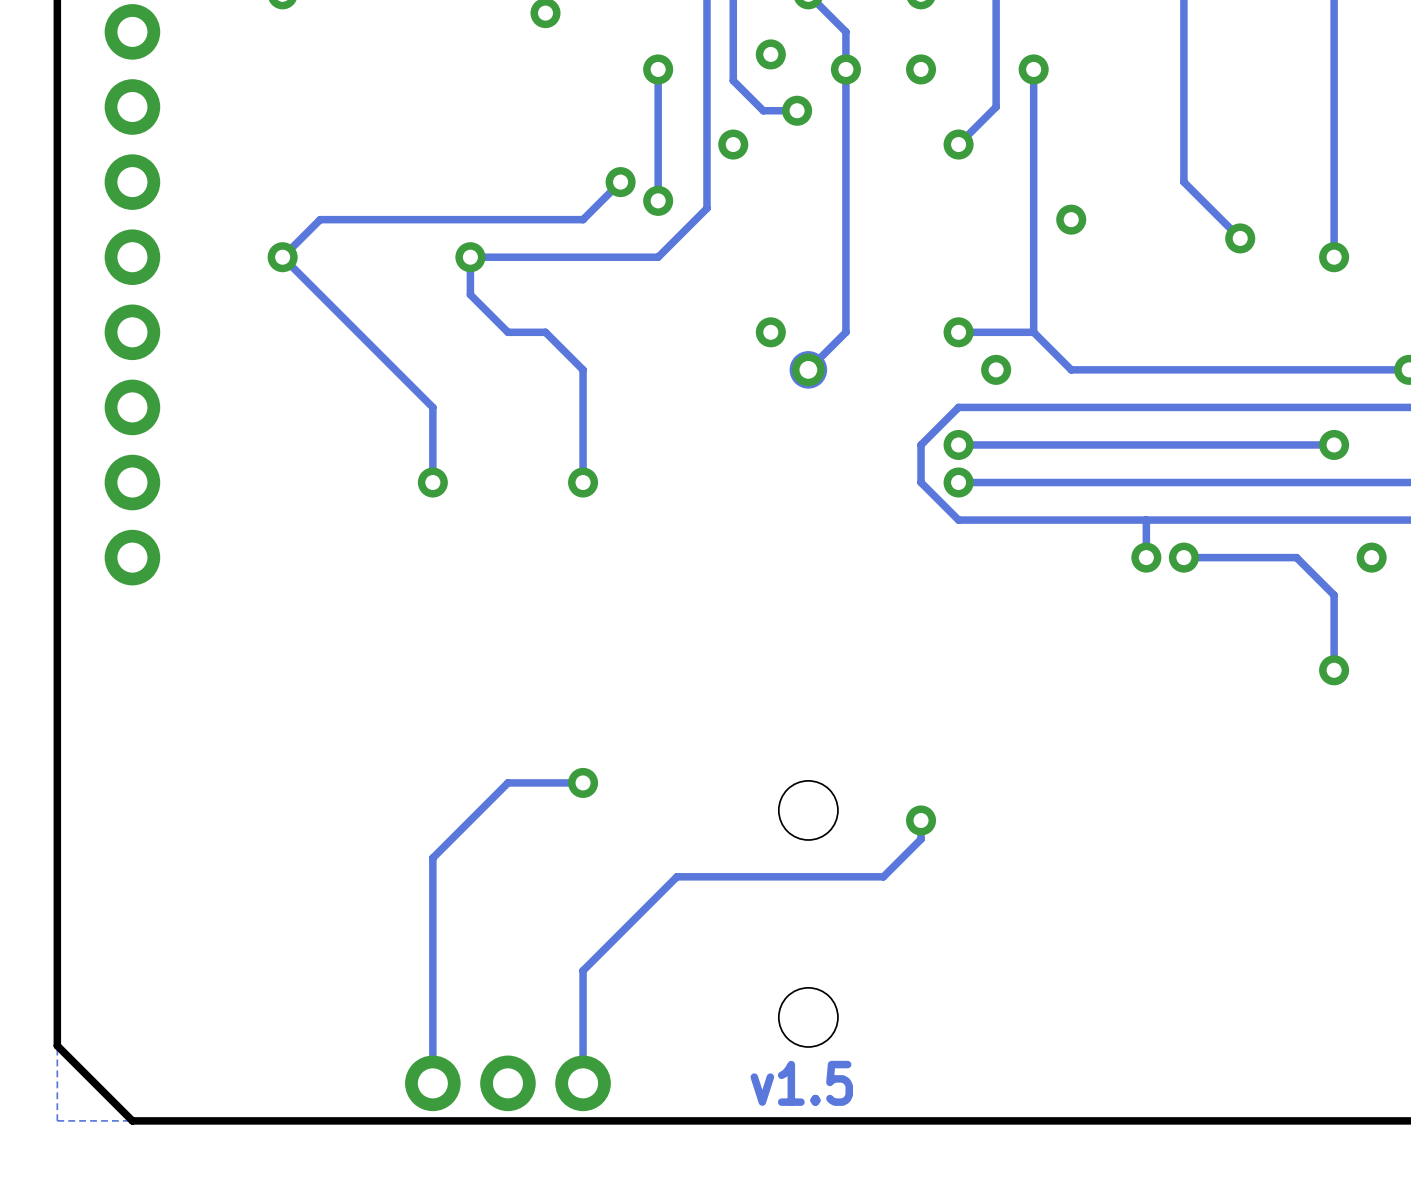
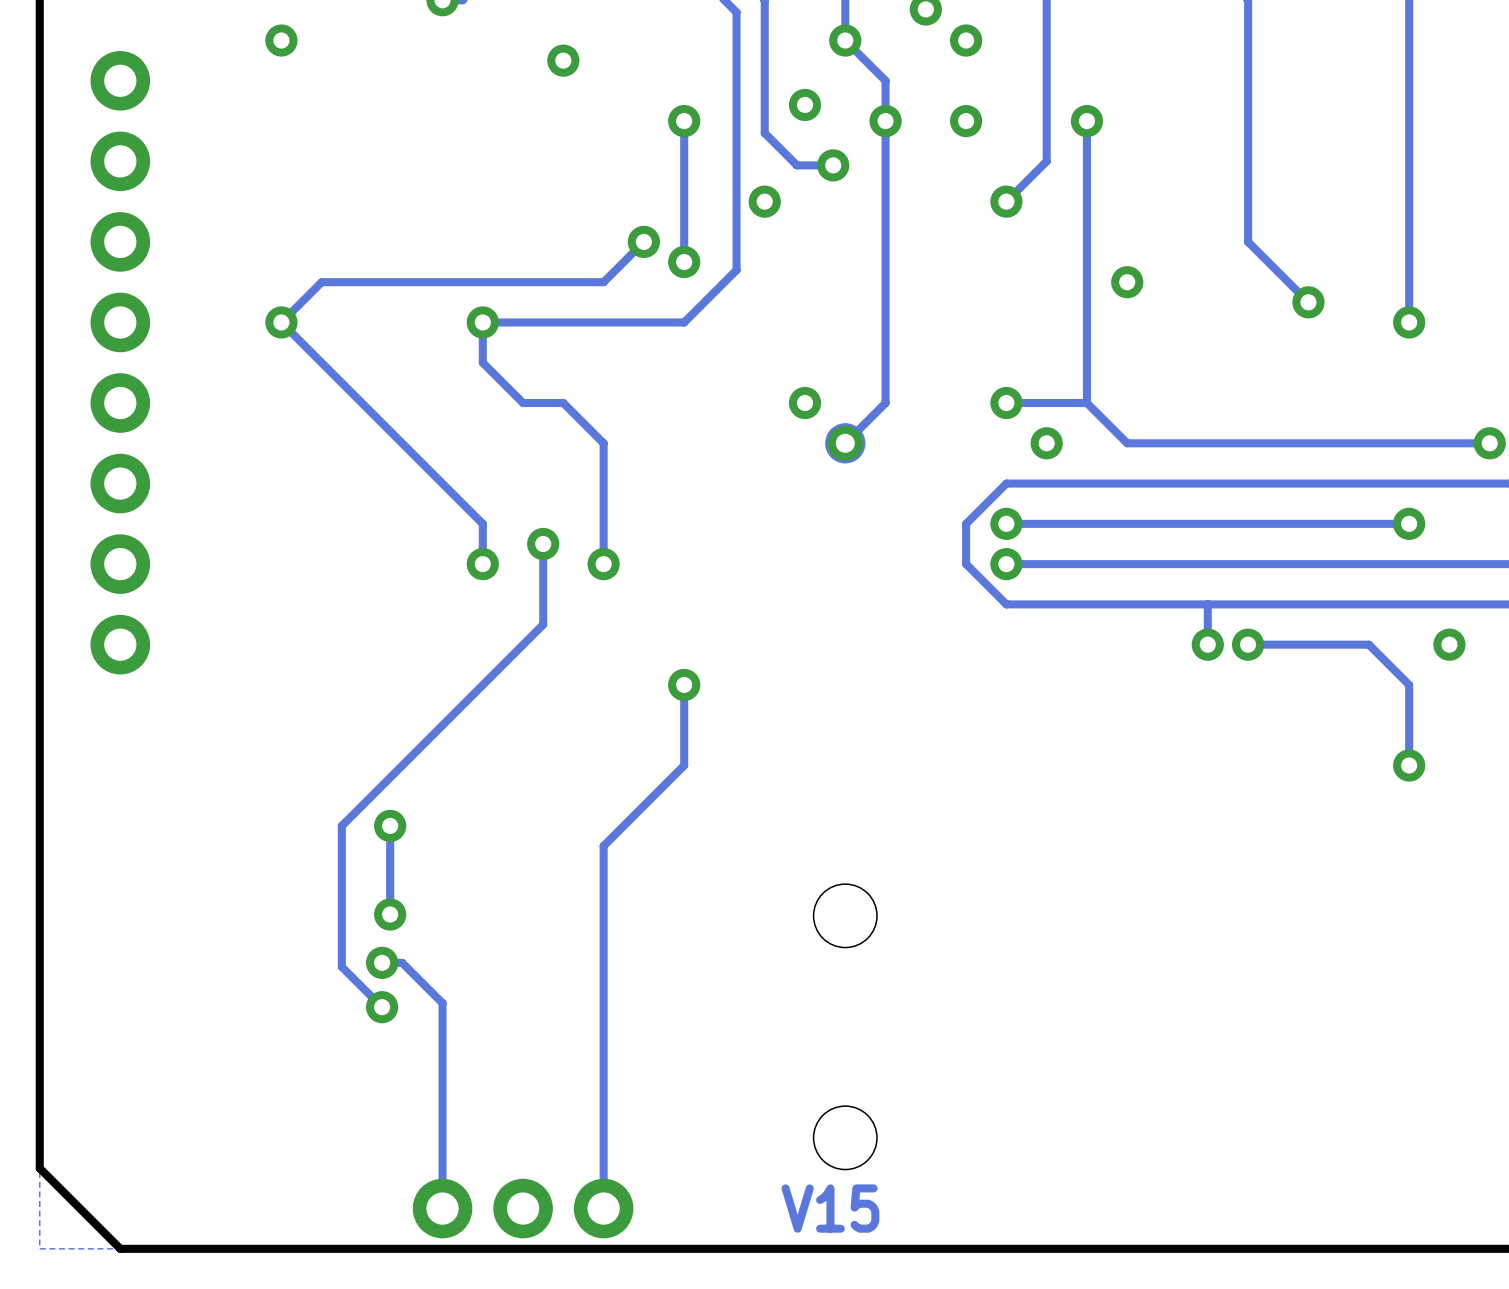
track: (432, 407) (432, 482) -> (442, 483) (482, 523) (482, 564)
track: none -> (543, 543) (543, 624) (341, 825) (341, 966) (382, 1007)
via: none -> (543, 543)
via position: (432, 482) -> (482, 564)
via: none -> (684, 684)
track: none -> (390, 825) (390, 914)
via: none -> (390, 825)
track: (583, 782) (507, 782) (432, 858) (432, 891) -> (382, 962) (402, 962) (442, 1003)
via: (583, 782) -> none
via: none -> (390, 914)
track: (921, 820) (921, 839) (883, 876) (676, 876) (583, 970) -> (684, 684) (684, 765) (603, 846) (603, 1087)
via: (921, 820) -> none
via: none -> (382, 962)
via: none -> (382, 1007)
text: v1.5 (801, 1083) -> V15 (830, 1208)

